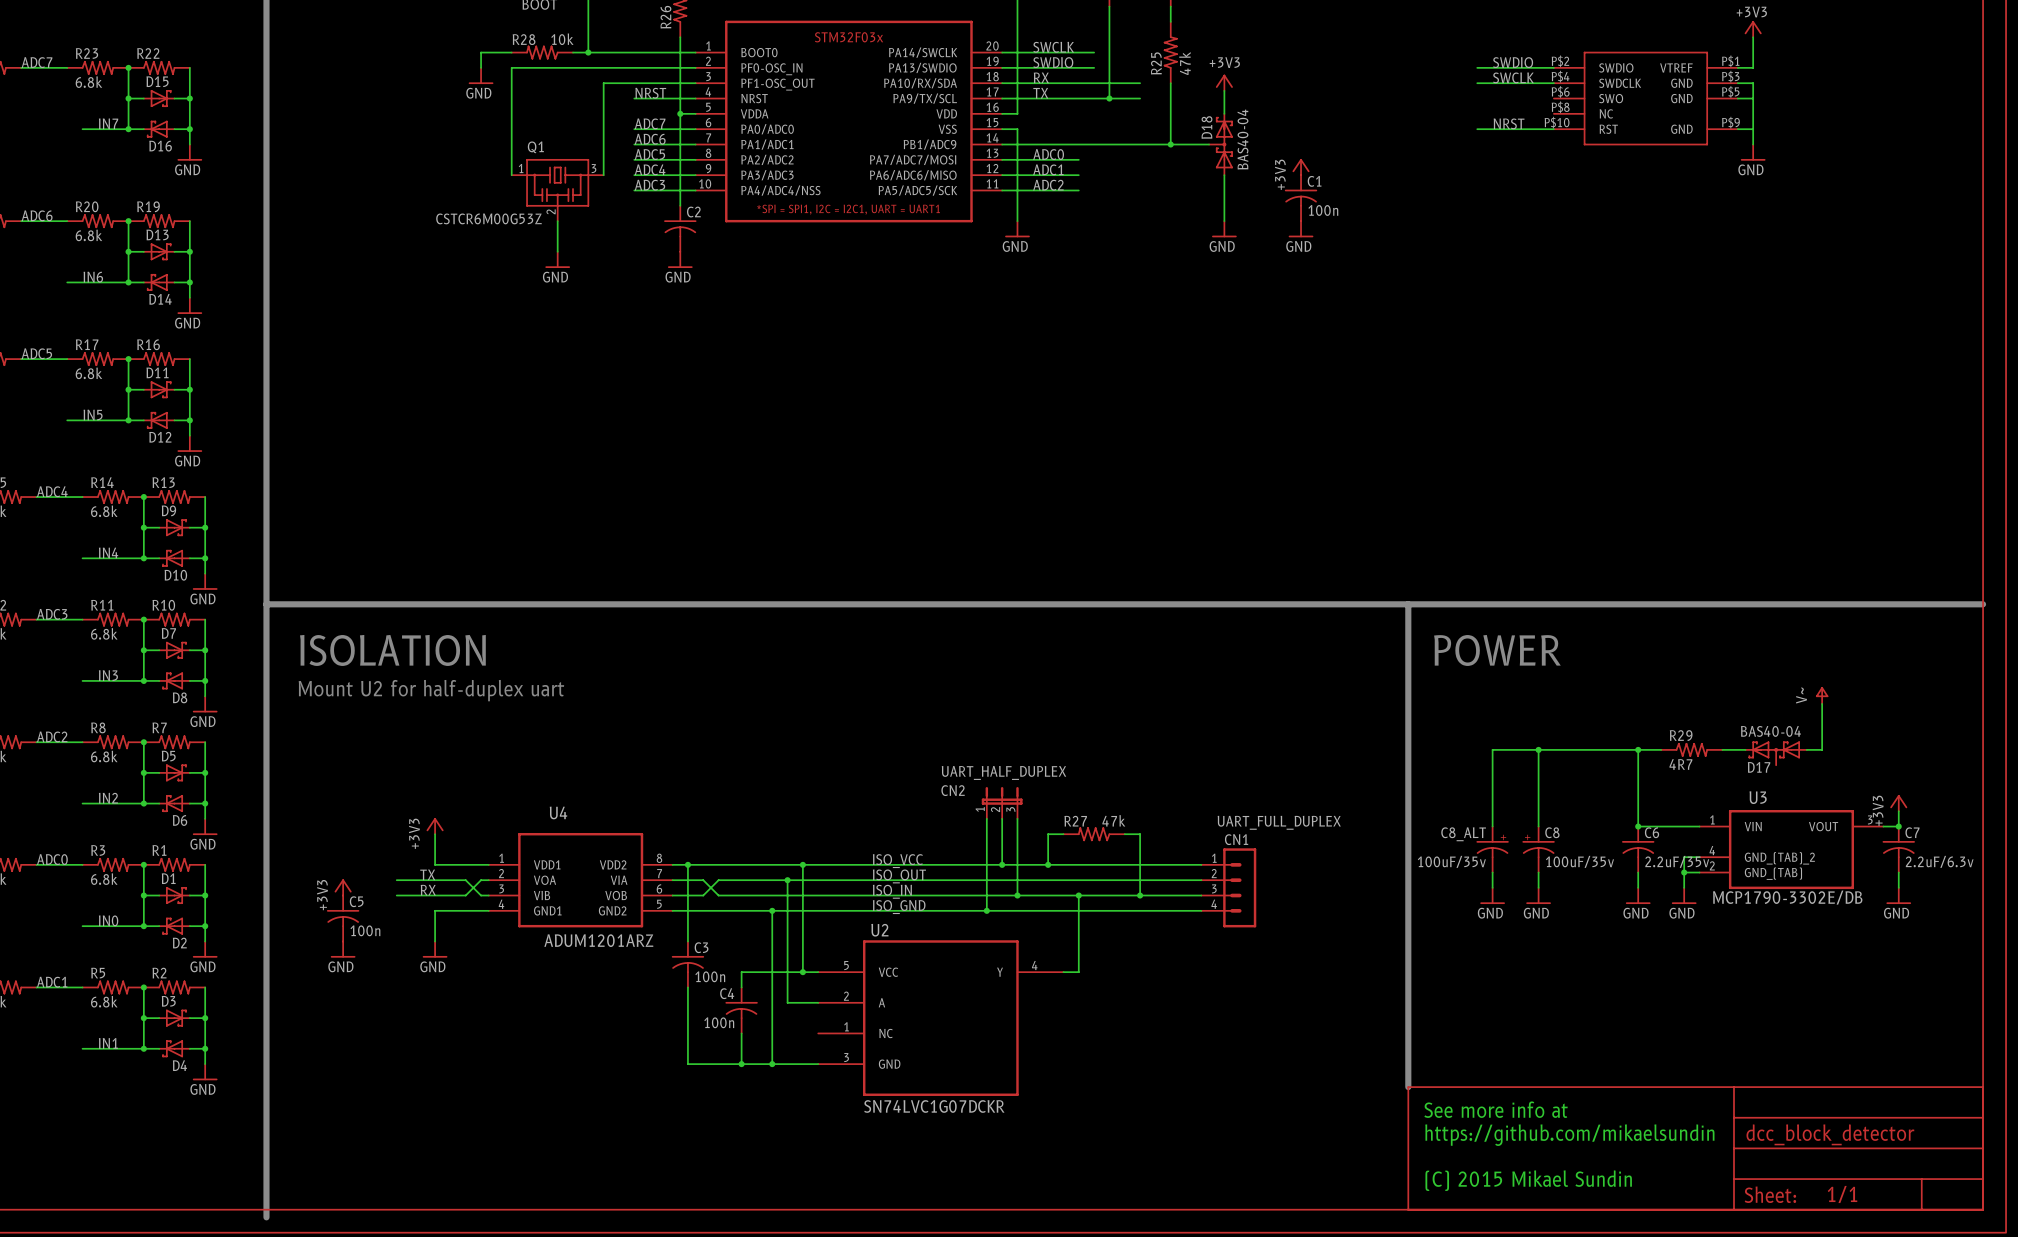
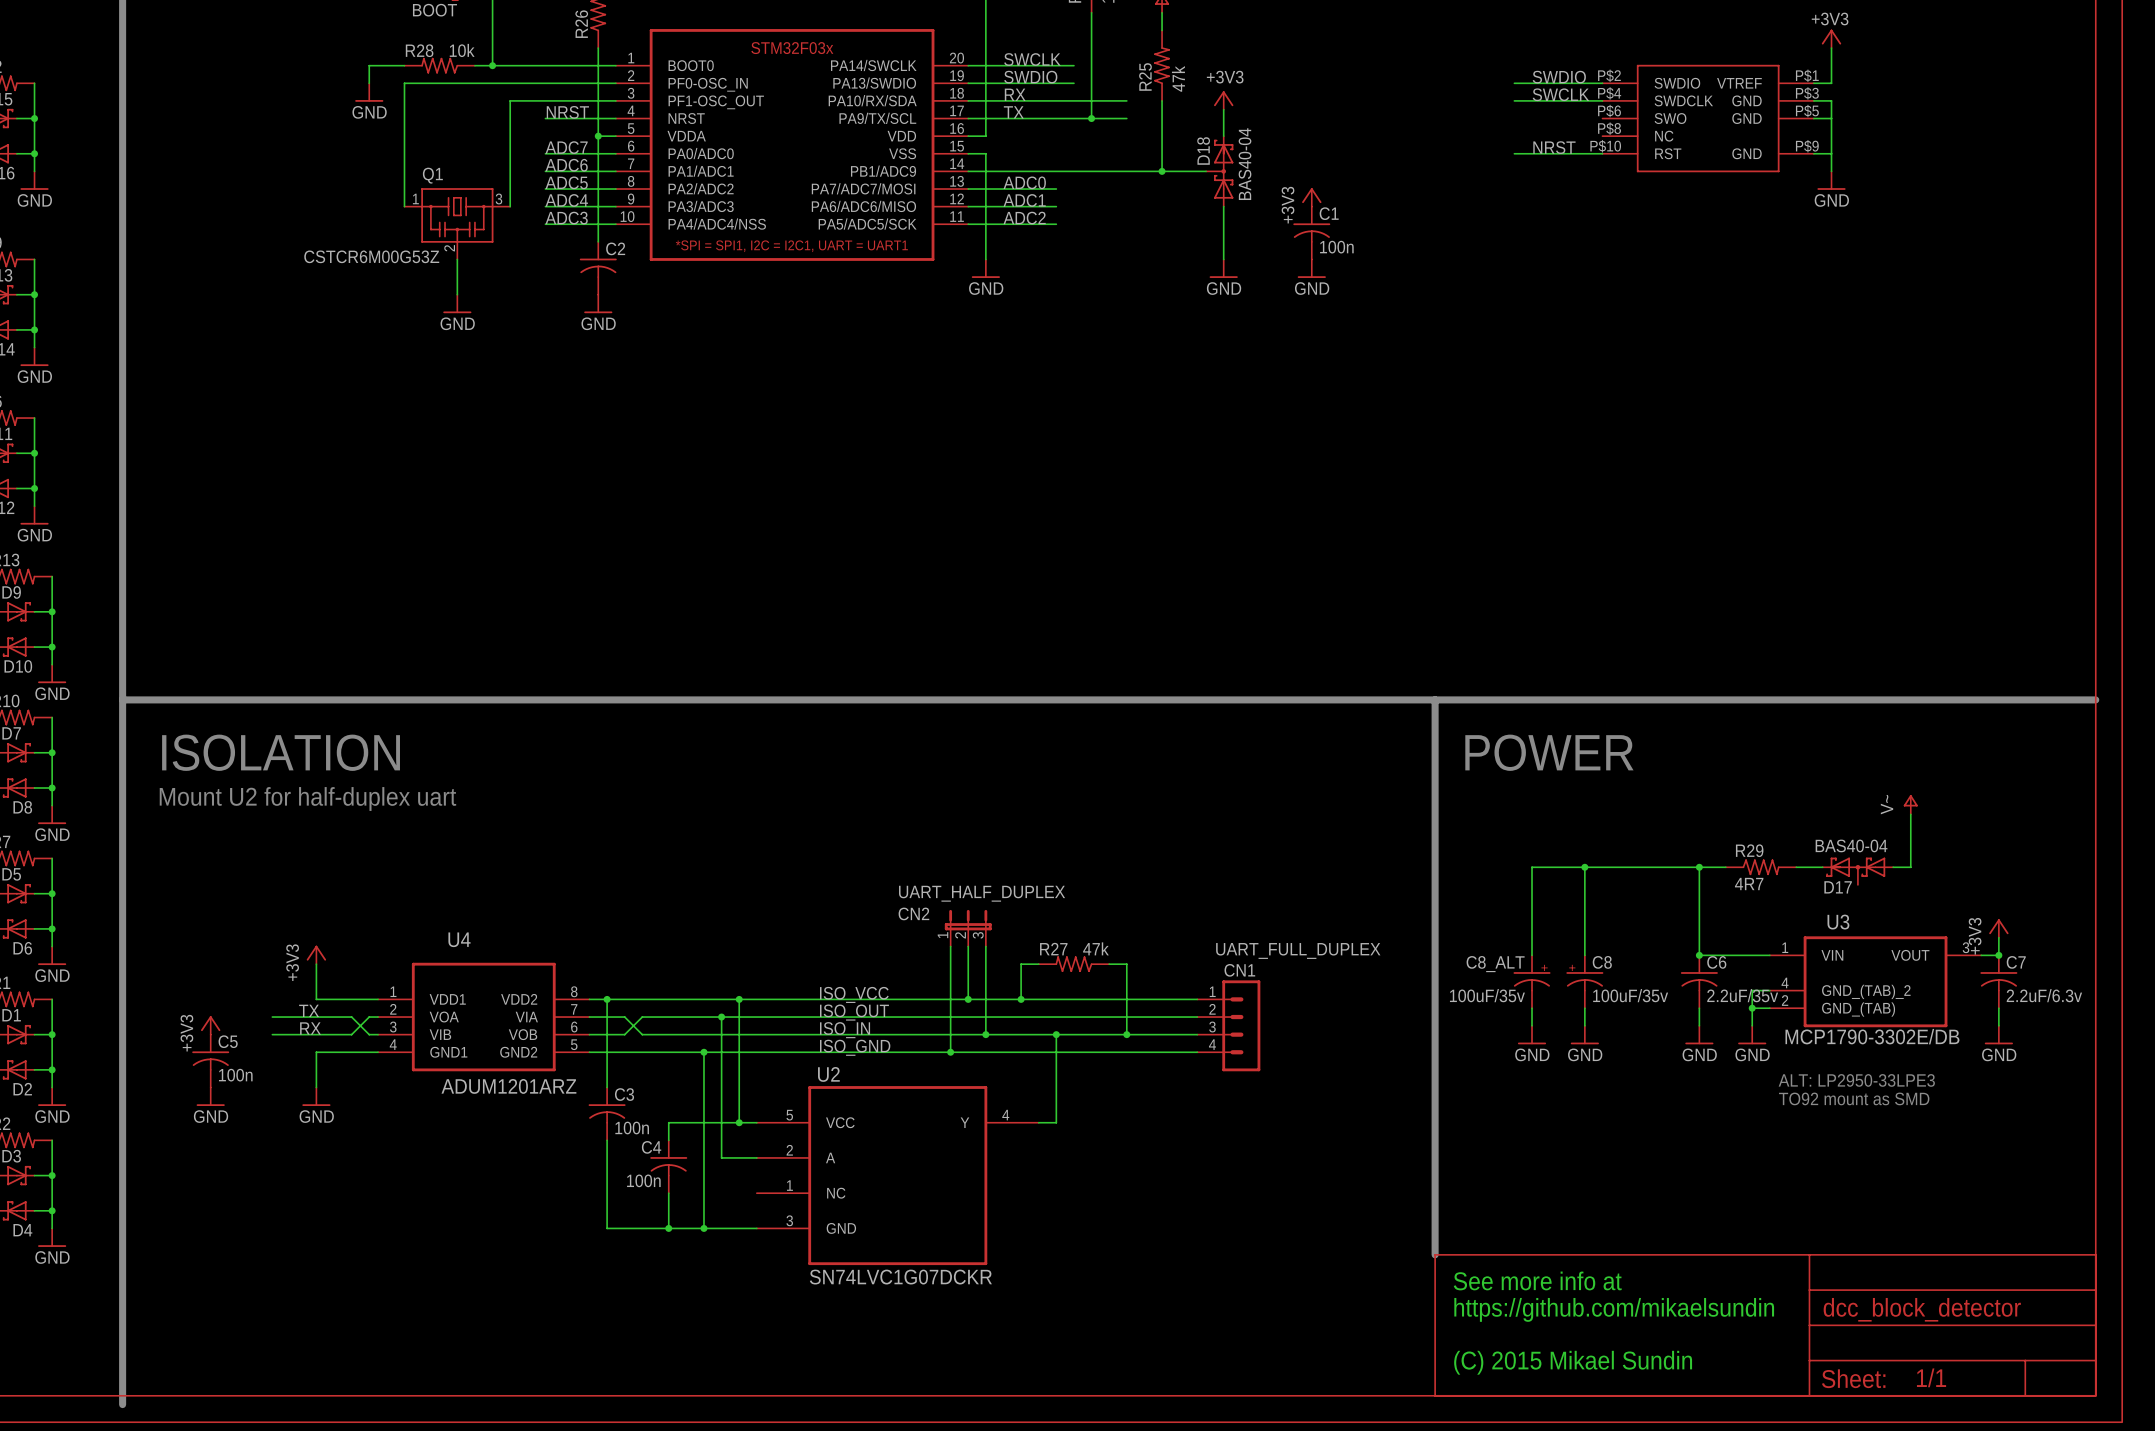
text: none -> ALT: LP2950-33LPE3 (1856, 1080)
text: none -> TO92 mount as SMD (1854, 1098)

